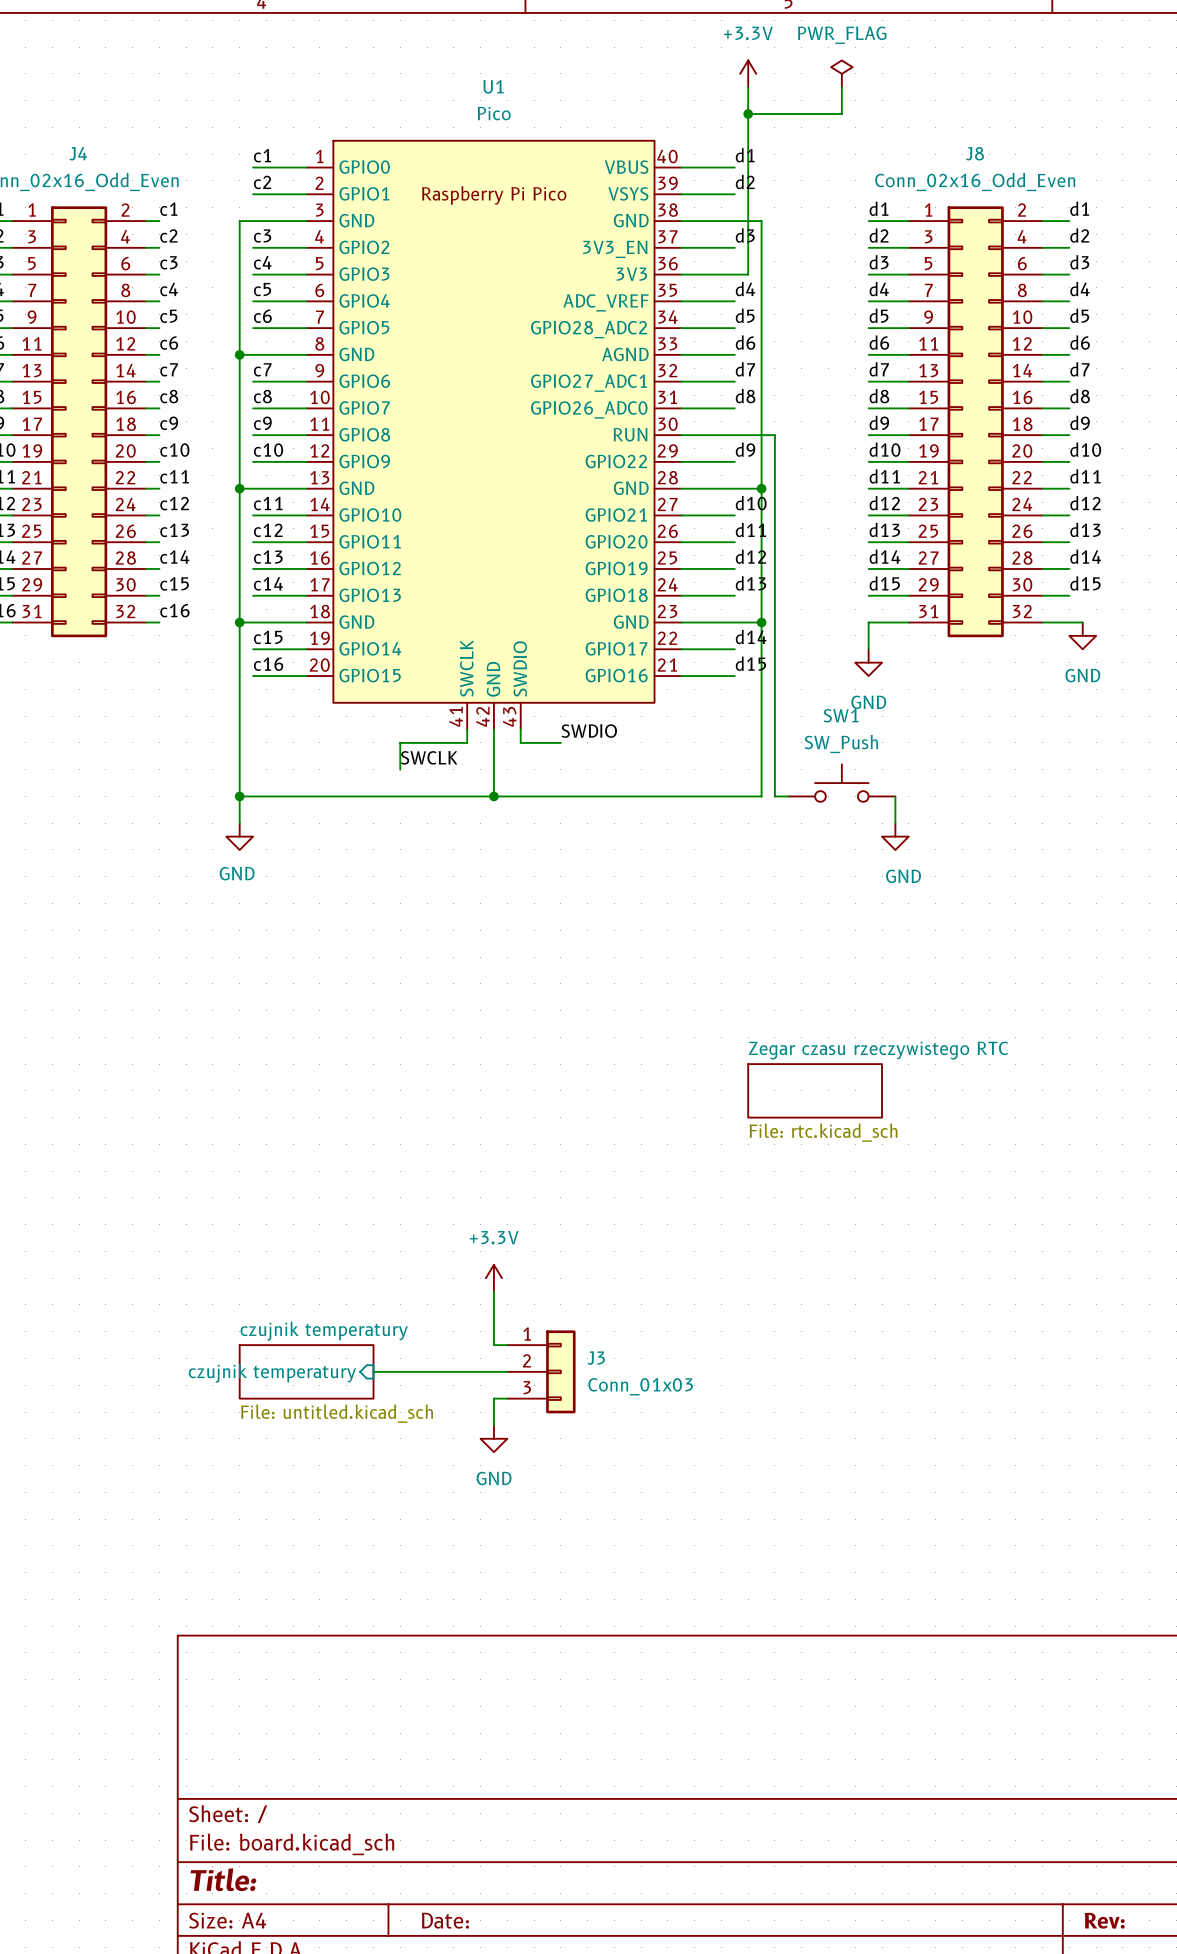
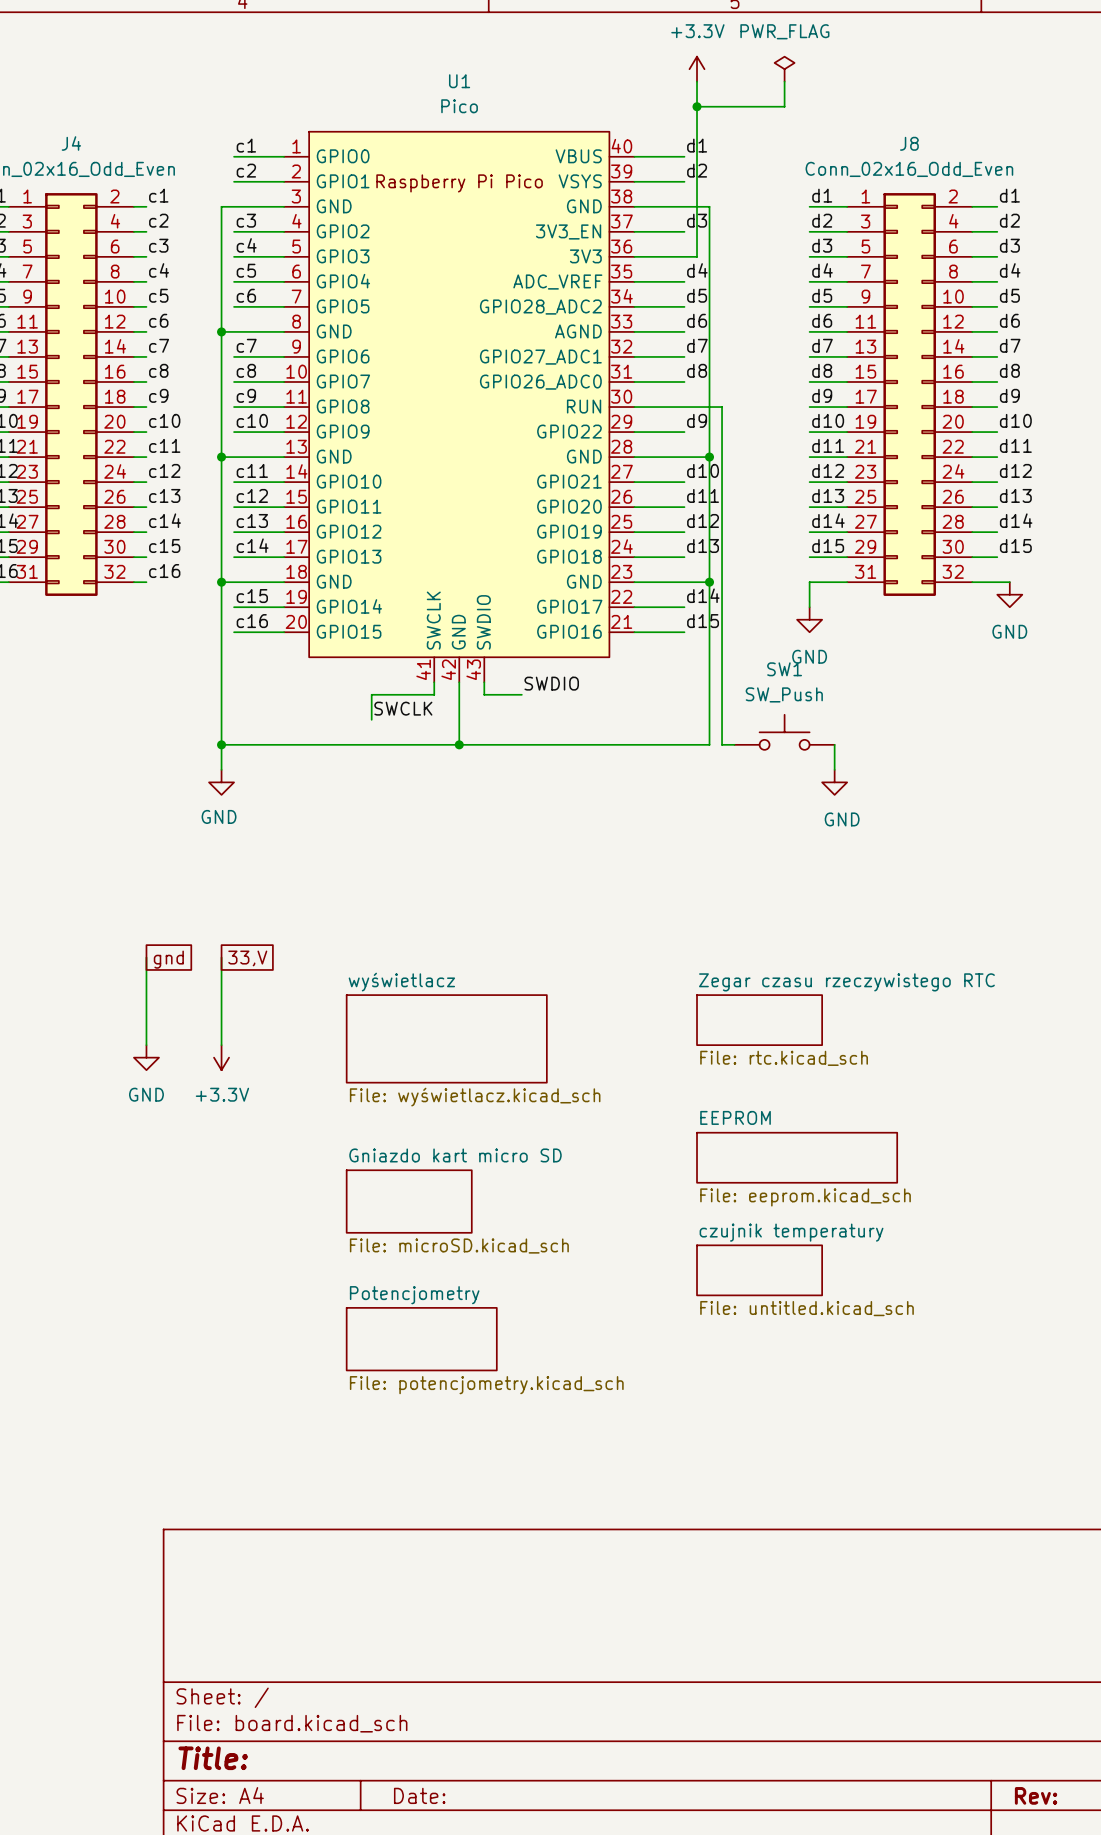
wire: none -> (146, 957) (146, 1045)
wire: none -> (221, 957) (221, 1045)
global label: none -> gnd (168, 959)
global label: none -> 33,V (247, 958)
sheet wyświetlacz: none -> File: wyświetlacz.kicad_sch (446, 1038)
power symbol: none -> GND (146, 1057)
power symbol: none -> +3.3V (221, 1057)
sheet EEPROM: none -> File: eeprom.kicad_sch (797, 1157)
power symbol: +3.3V (493, 1278) -> none
sheet Gniazdo kart micro SD: none -> File: microSD.kicad_sch (409, 1201)
wire: (493, 1291) (493, 1345) (507, 1345) -> none
sheet czujnik temperatury: none -> File: untitled.kicad_sch (759, 1270)
sheet czujnik temperatury: File: untitled.kicad_sch (306, 1371) -> none
wire: (373, 1371) (507, 1371) -> none
J3: Conn_01x03 (541, 1371) -> none
sheet pin: czujnik temperatury (272, 1373) -> none
wire: (507, 1398) (493, 1398) (493, 1425) -> none
sheet Potencjometry: none -> File: potencjometry.kicad_sch (421, 1339)
power symbol: GND (493, 1438) -> none

